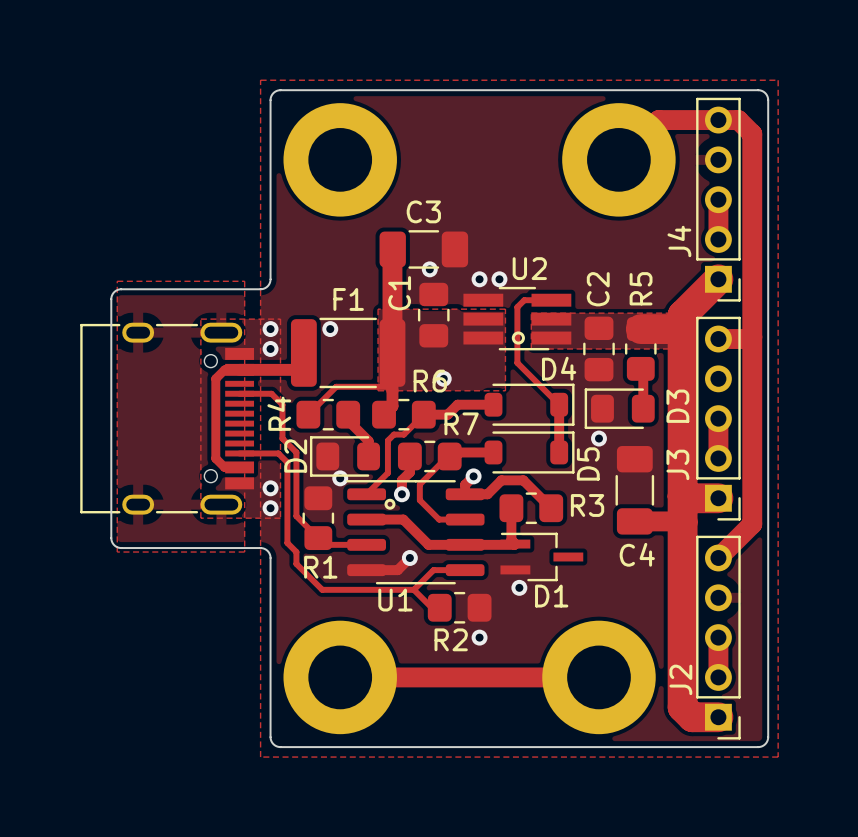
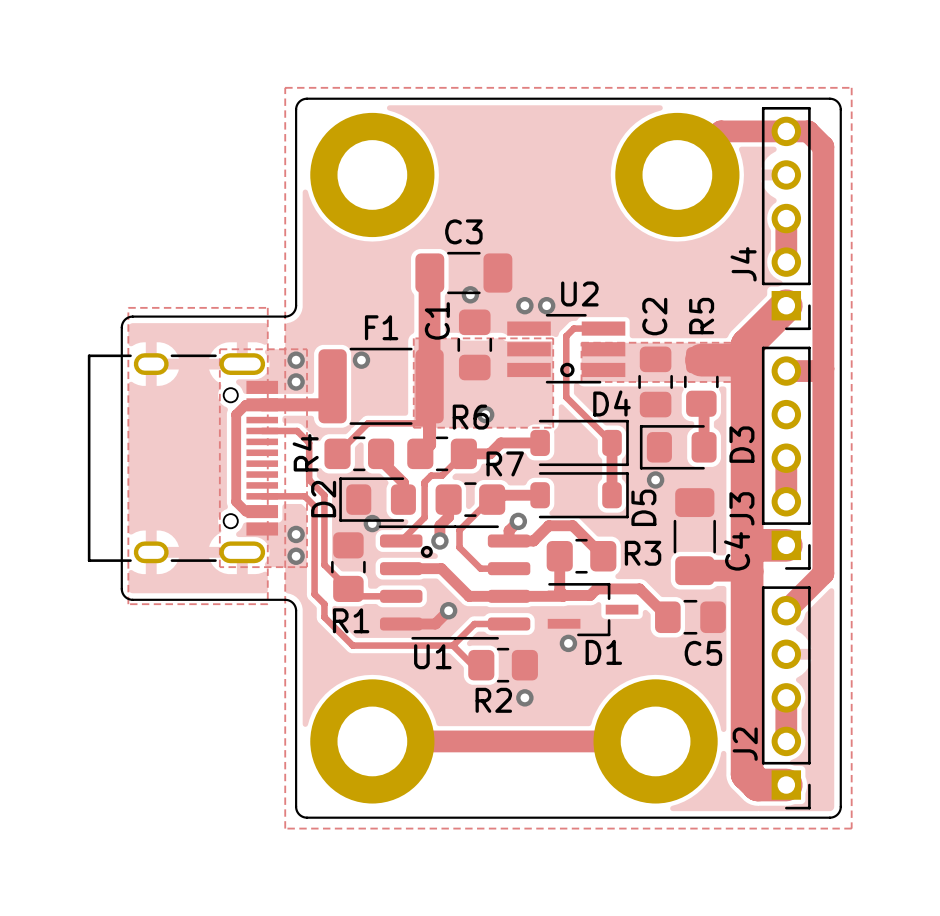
track: none -> (564, 595) (590, 595) (596, 588) (639, 588) (667, 617)
C4 name rotation: 0° (637, 554) -> 90° counterclockwise (737, 551)
C4 name position: C4 (637, 554) -> C4 (737, 551)
C5: none -> (690, 617)

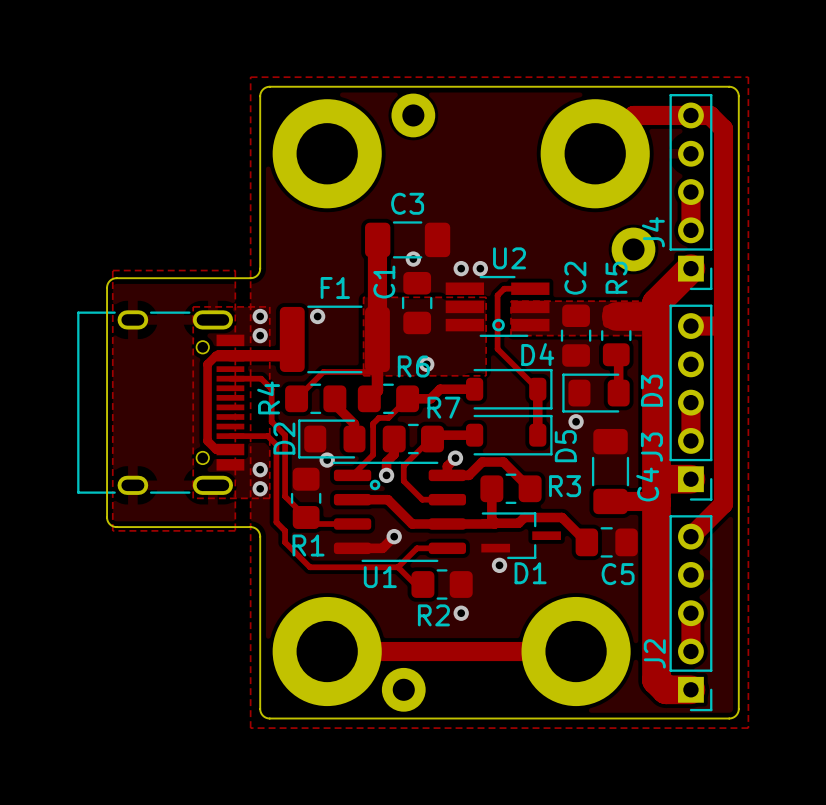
part: none -> (413, 115)
part: none -> (633, 249)
part: none -> (403, 689)

